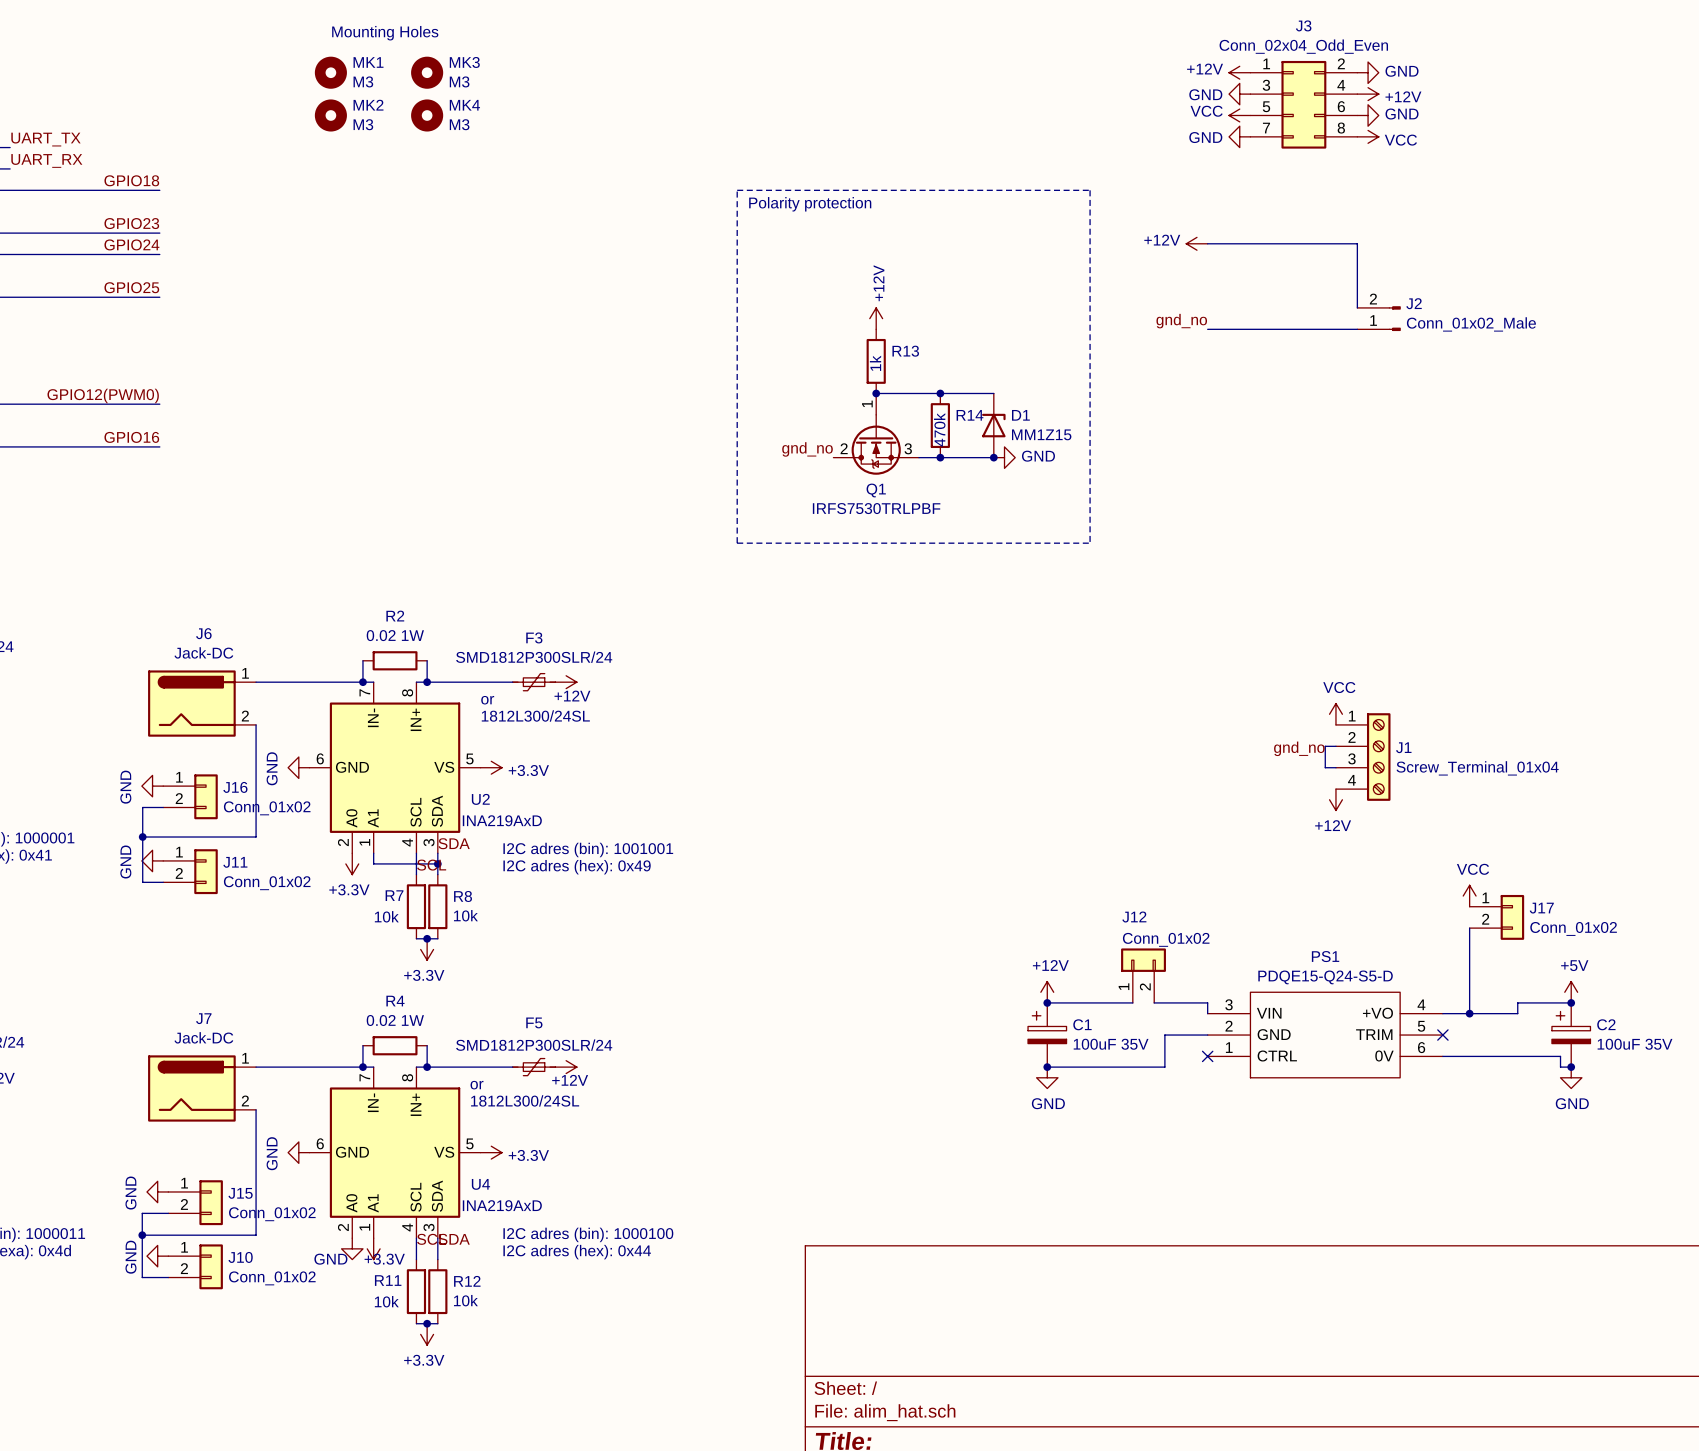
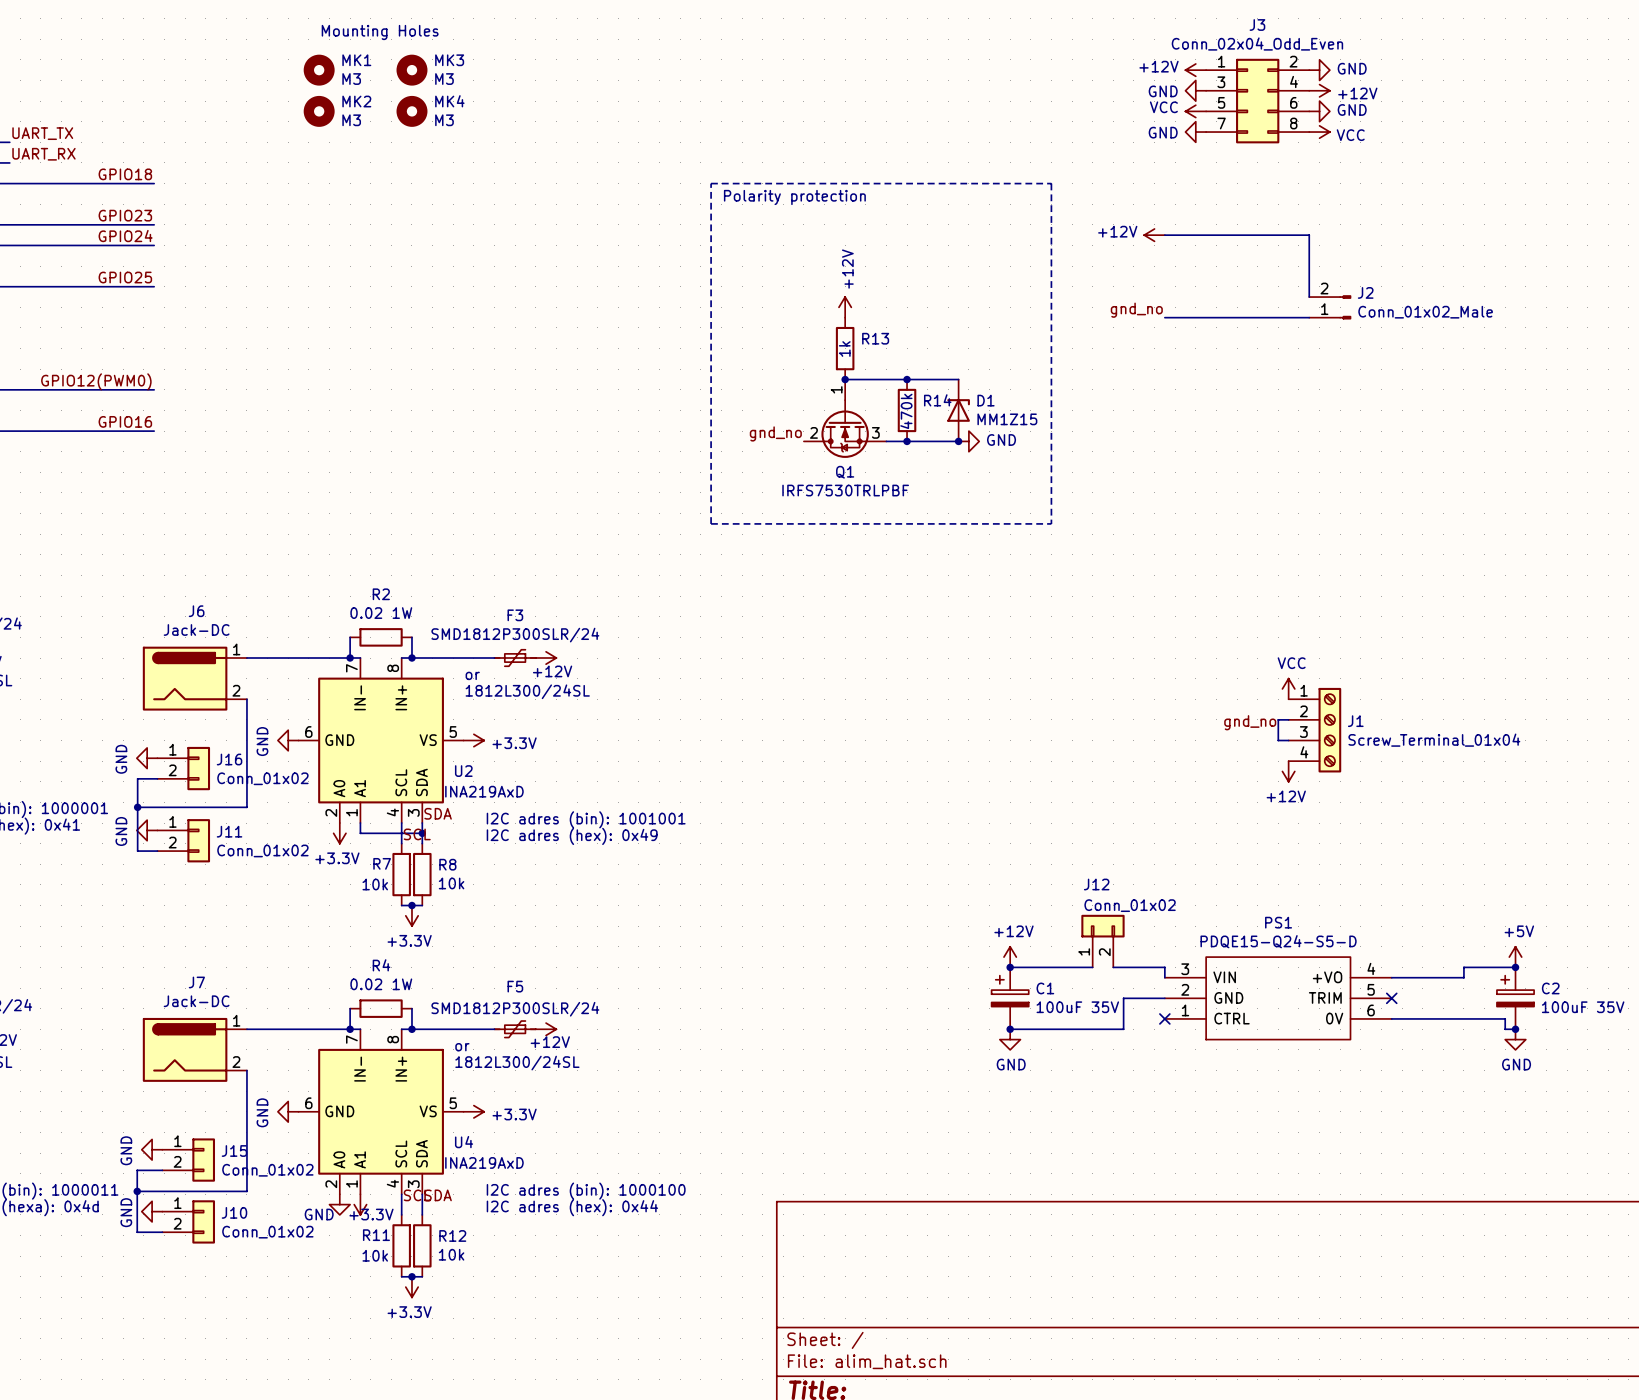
power symbol: VCC (1469, 896) -> none
J17: Conn_01x02 (1496, 917) -> none
wire: (1469, 928) (1469, 1013) -> none
junction: (1469, 1013) -> none

